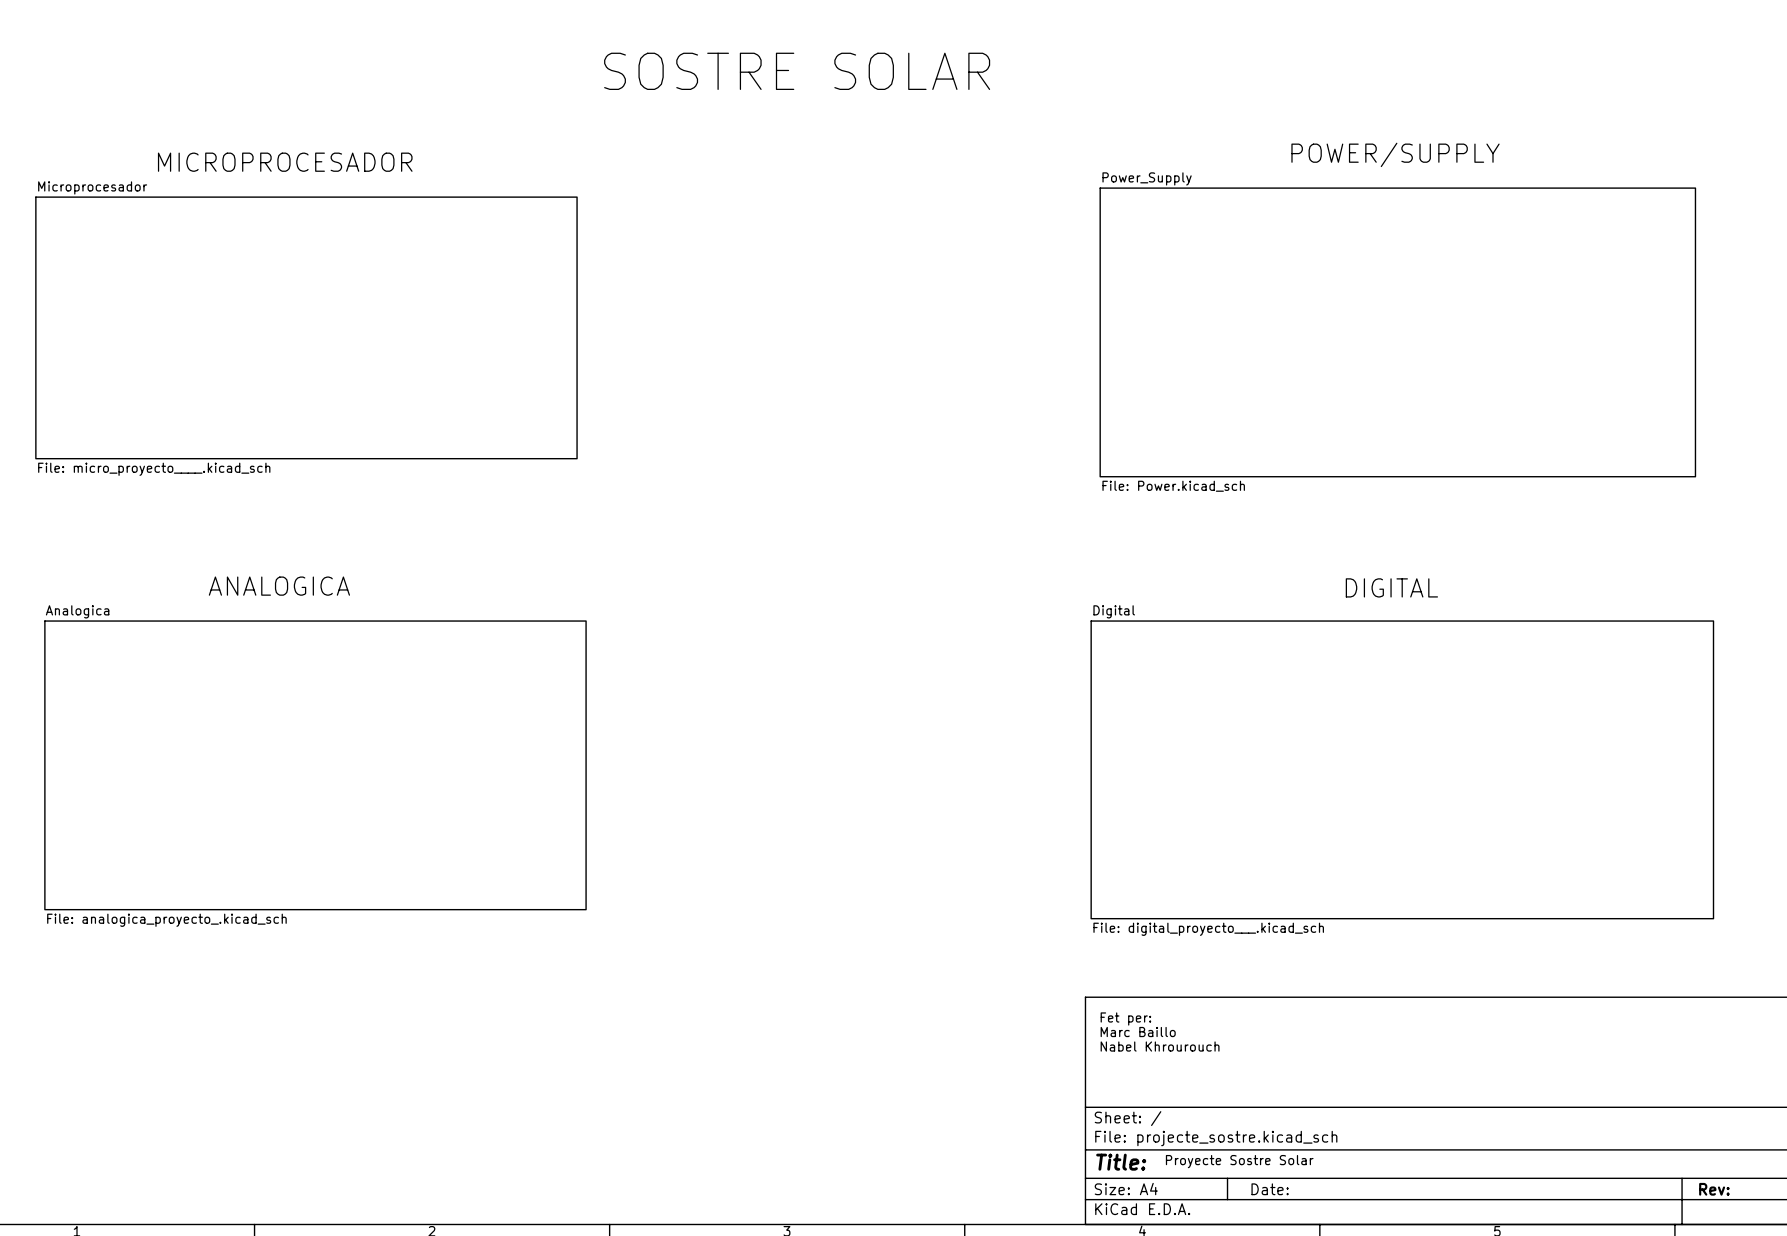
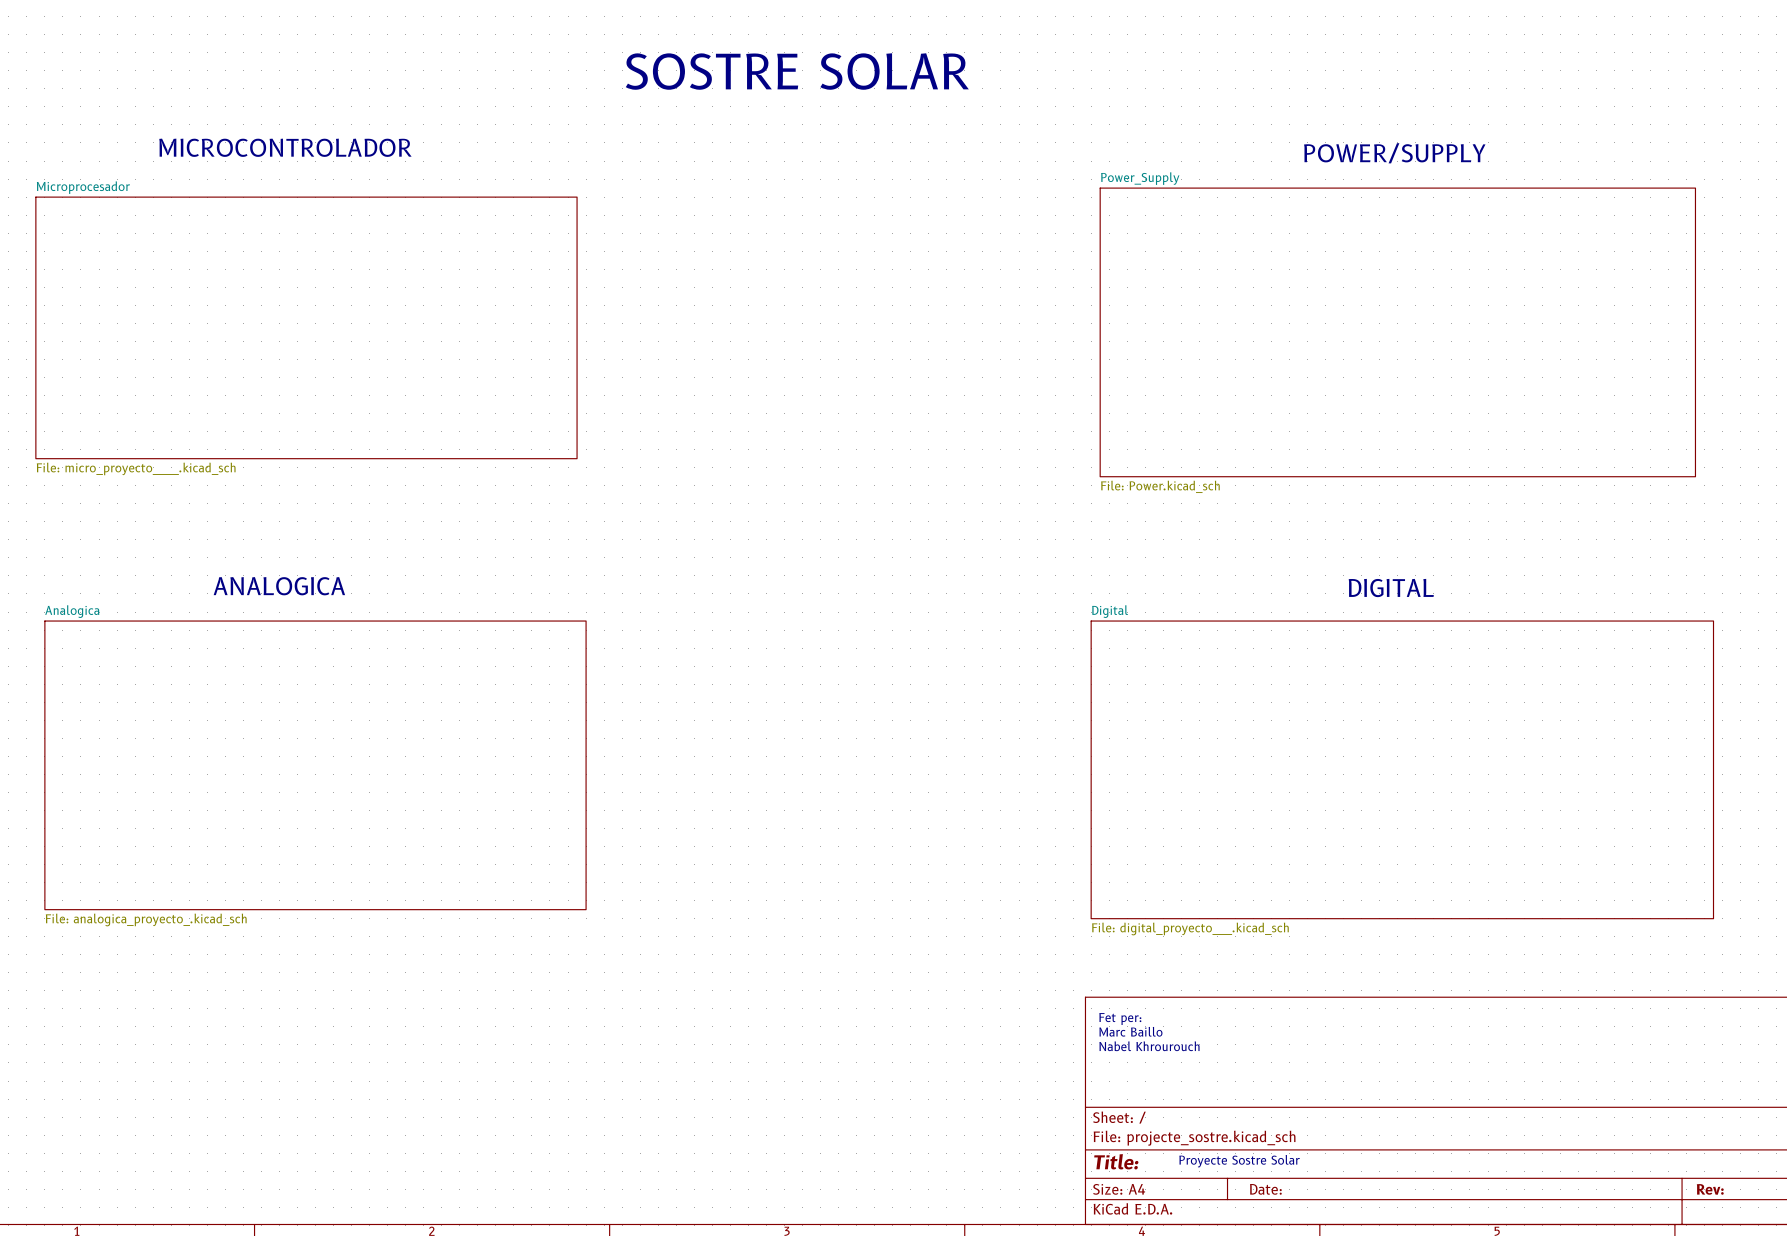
text: MICROPROCESADOR (285, 162) -> MICROCONTROLADOR (285, 147)

